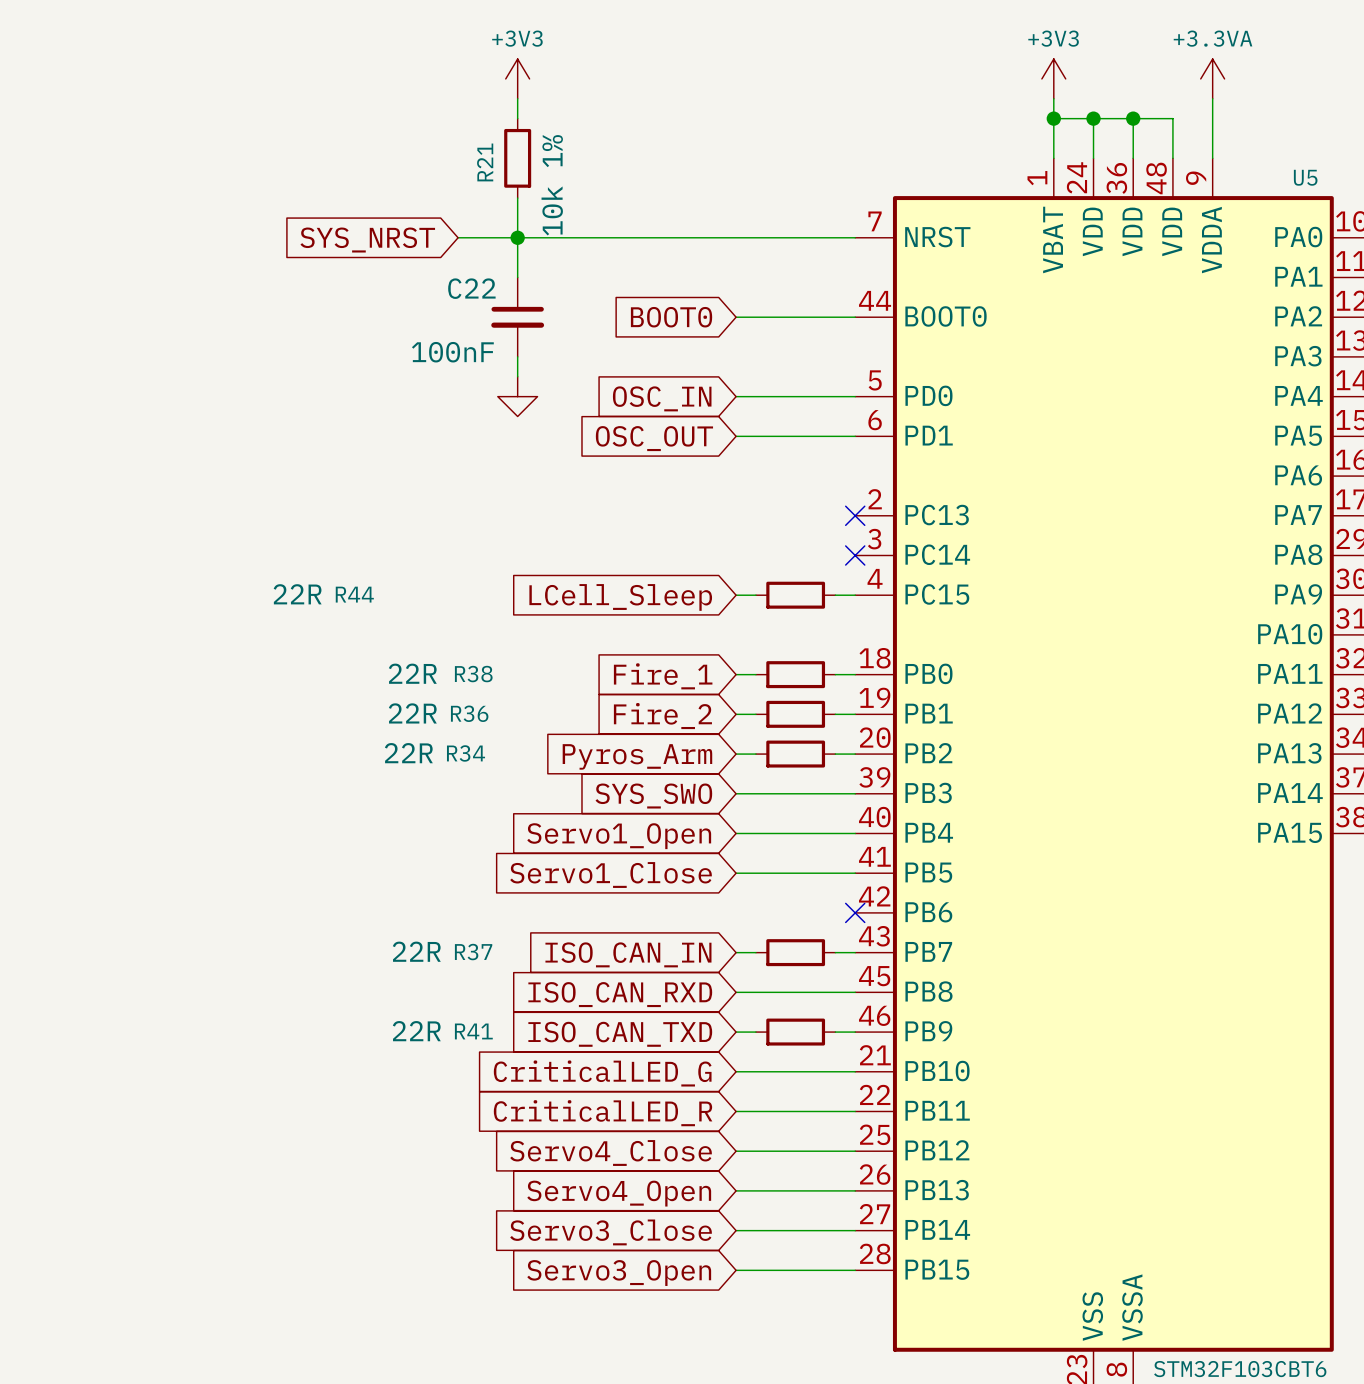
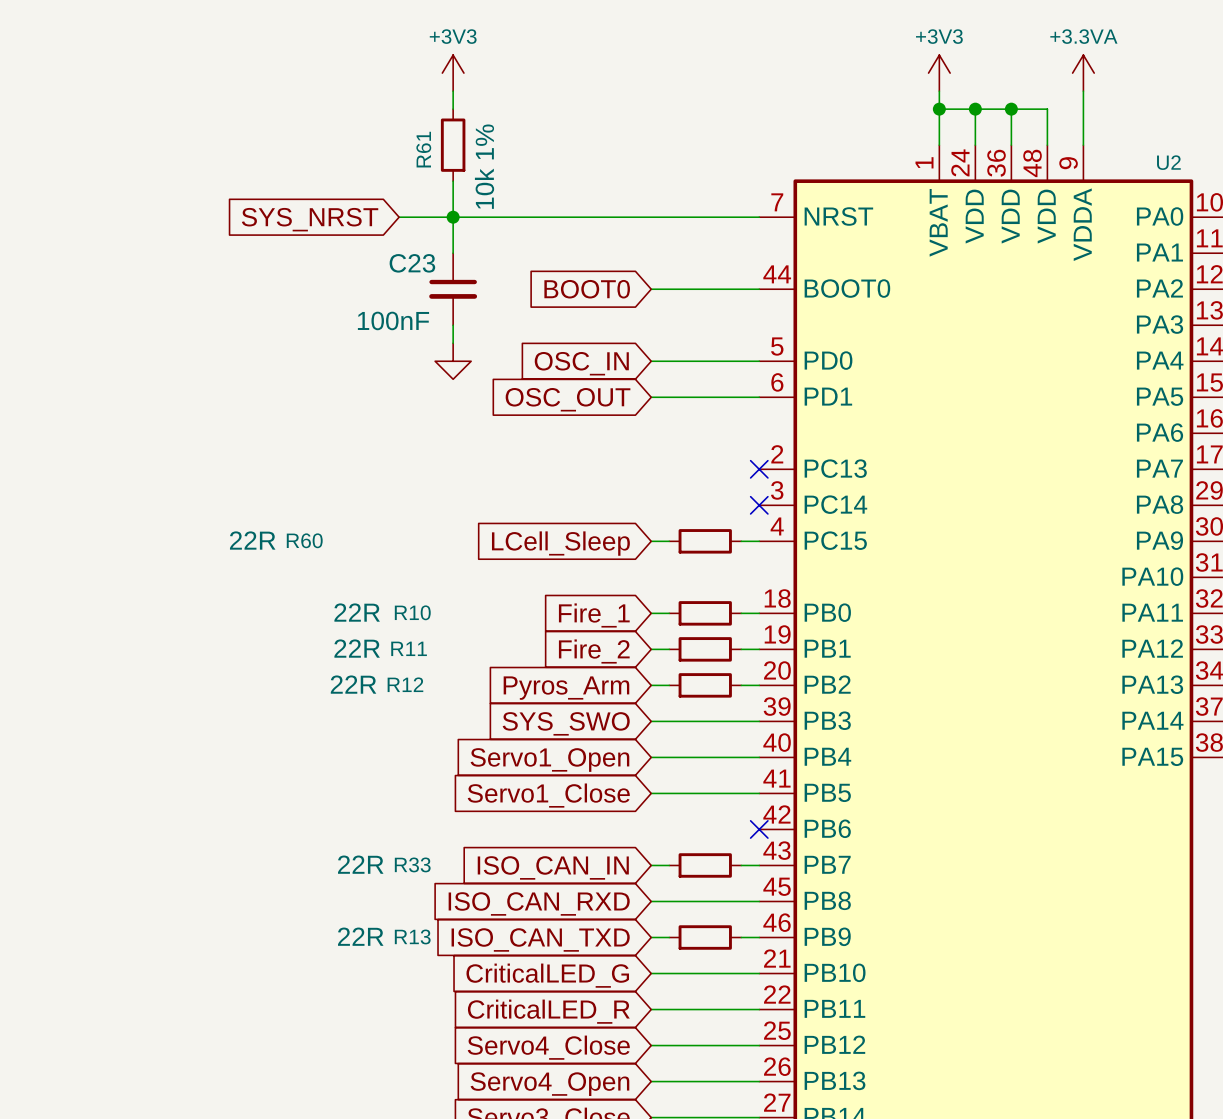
R21 name: R21 (485, 162) -> R61 (423, 149)
U5 name: U5 (1305, 177) -> U2 (1168, 162)
C22 name: C22 (471, 288) -> C23 (412, 263)
R44 name: R44 (354, 594) -> R60 (304, 540)
R38 name: R38 (473, 674) -> R10 (412, 612)
R36 name: R36 (469, 713) -> R11 (409, 648)
R34 name: R34 (466, 753) -> R12 (405, 684)
R37 name: R37 (473, 952) -> R33 (412, 864)
R41 name: R41 (473, 1031) -> R13 (412, 936)

